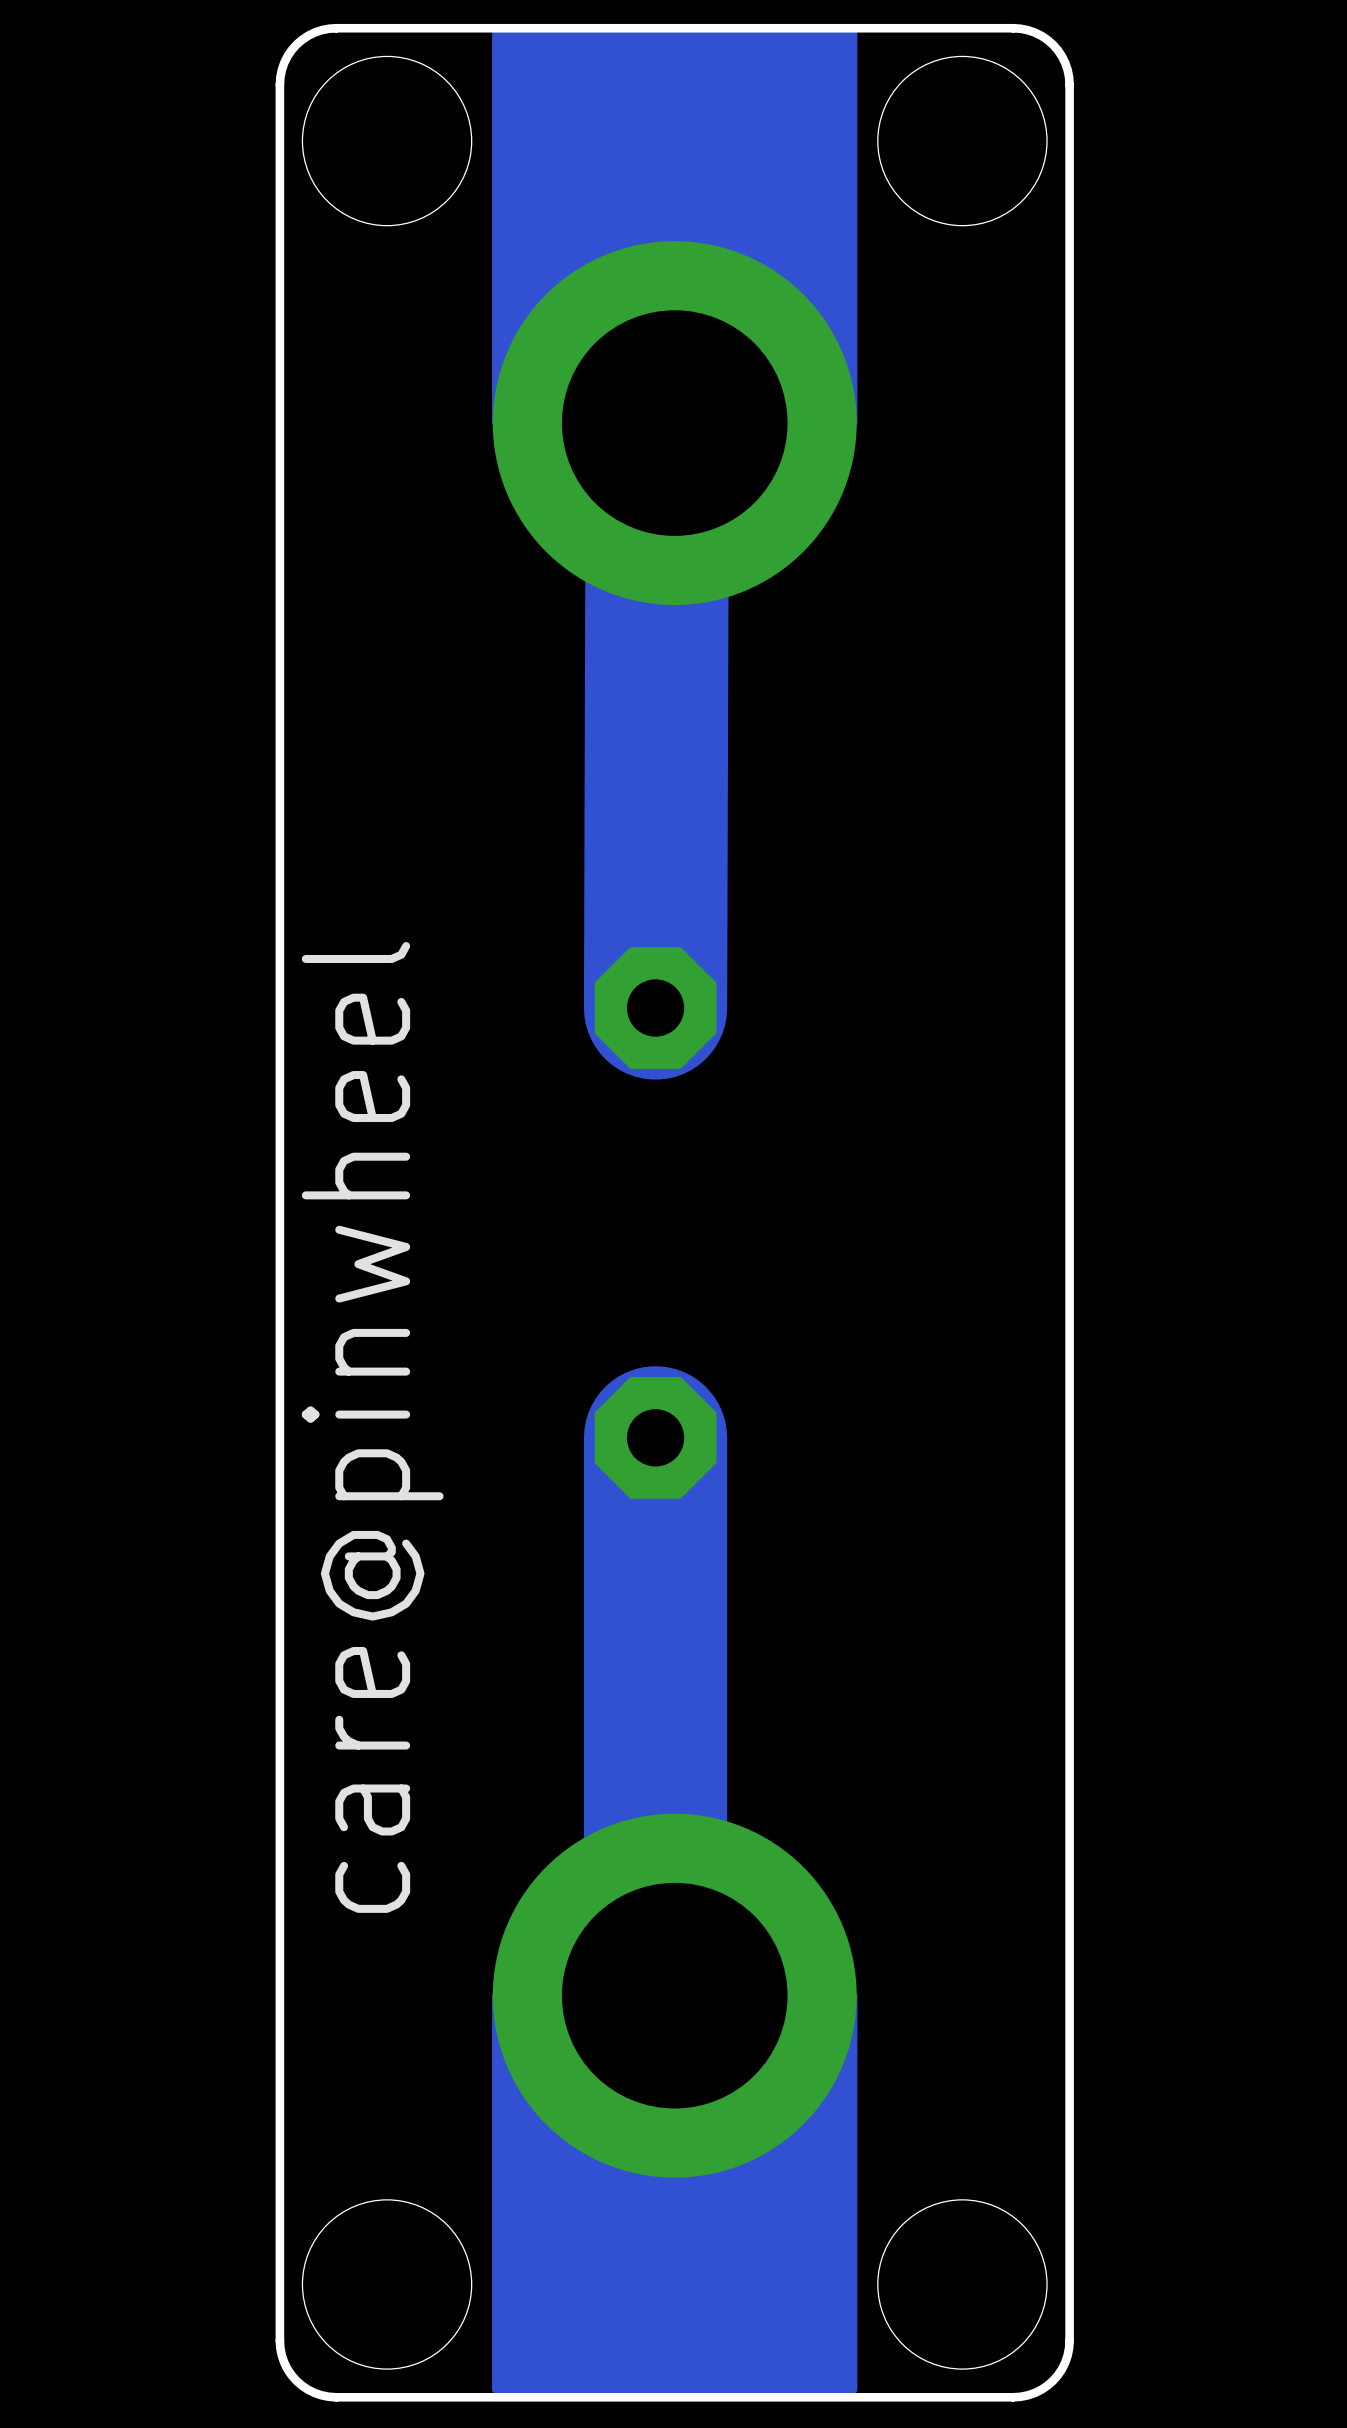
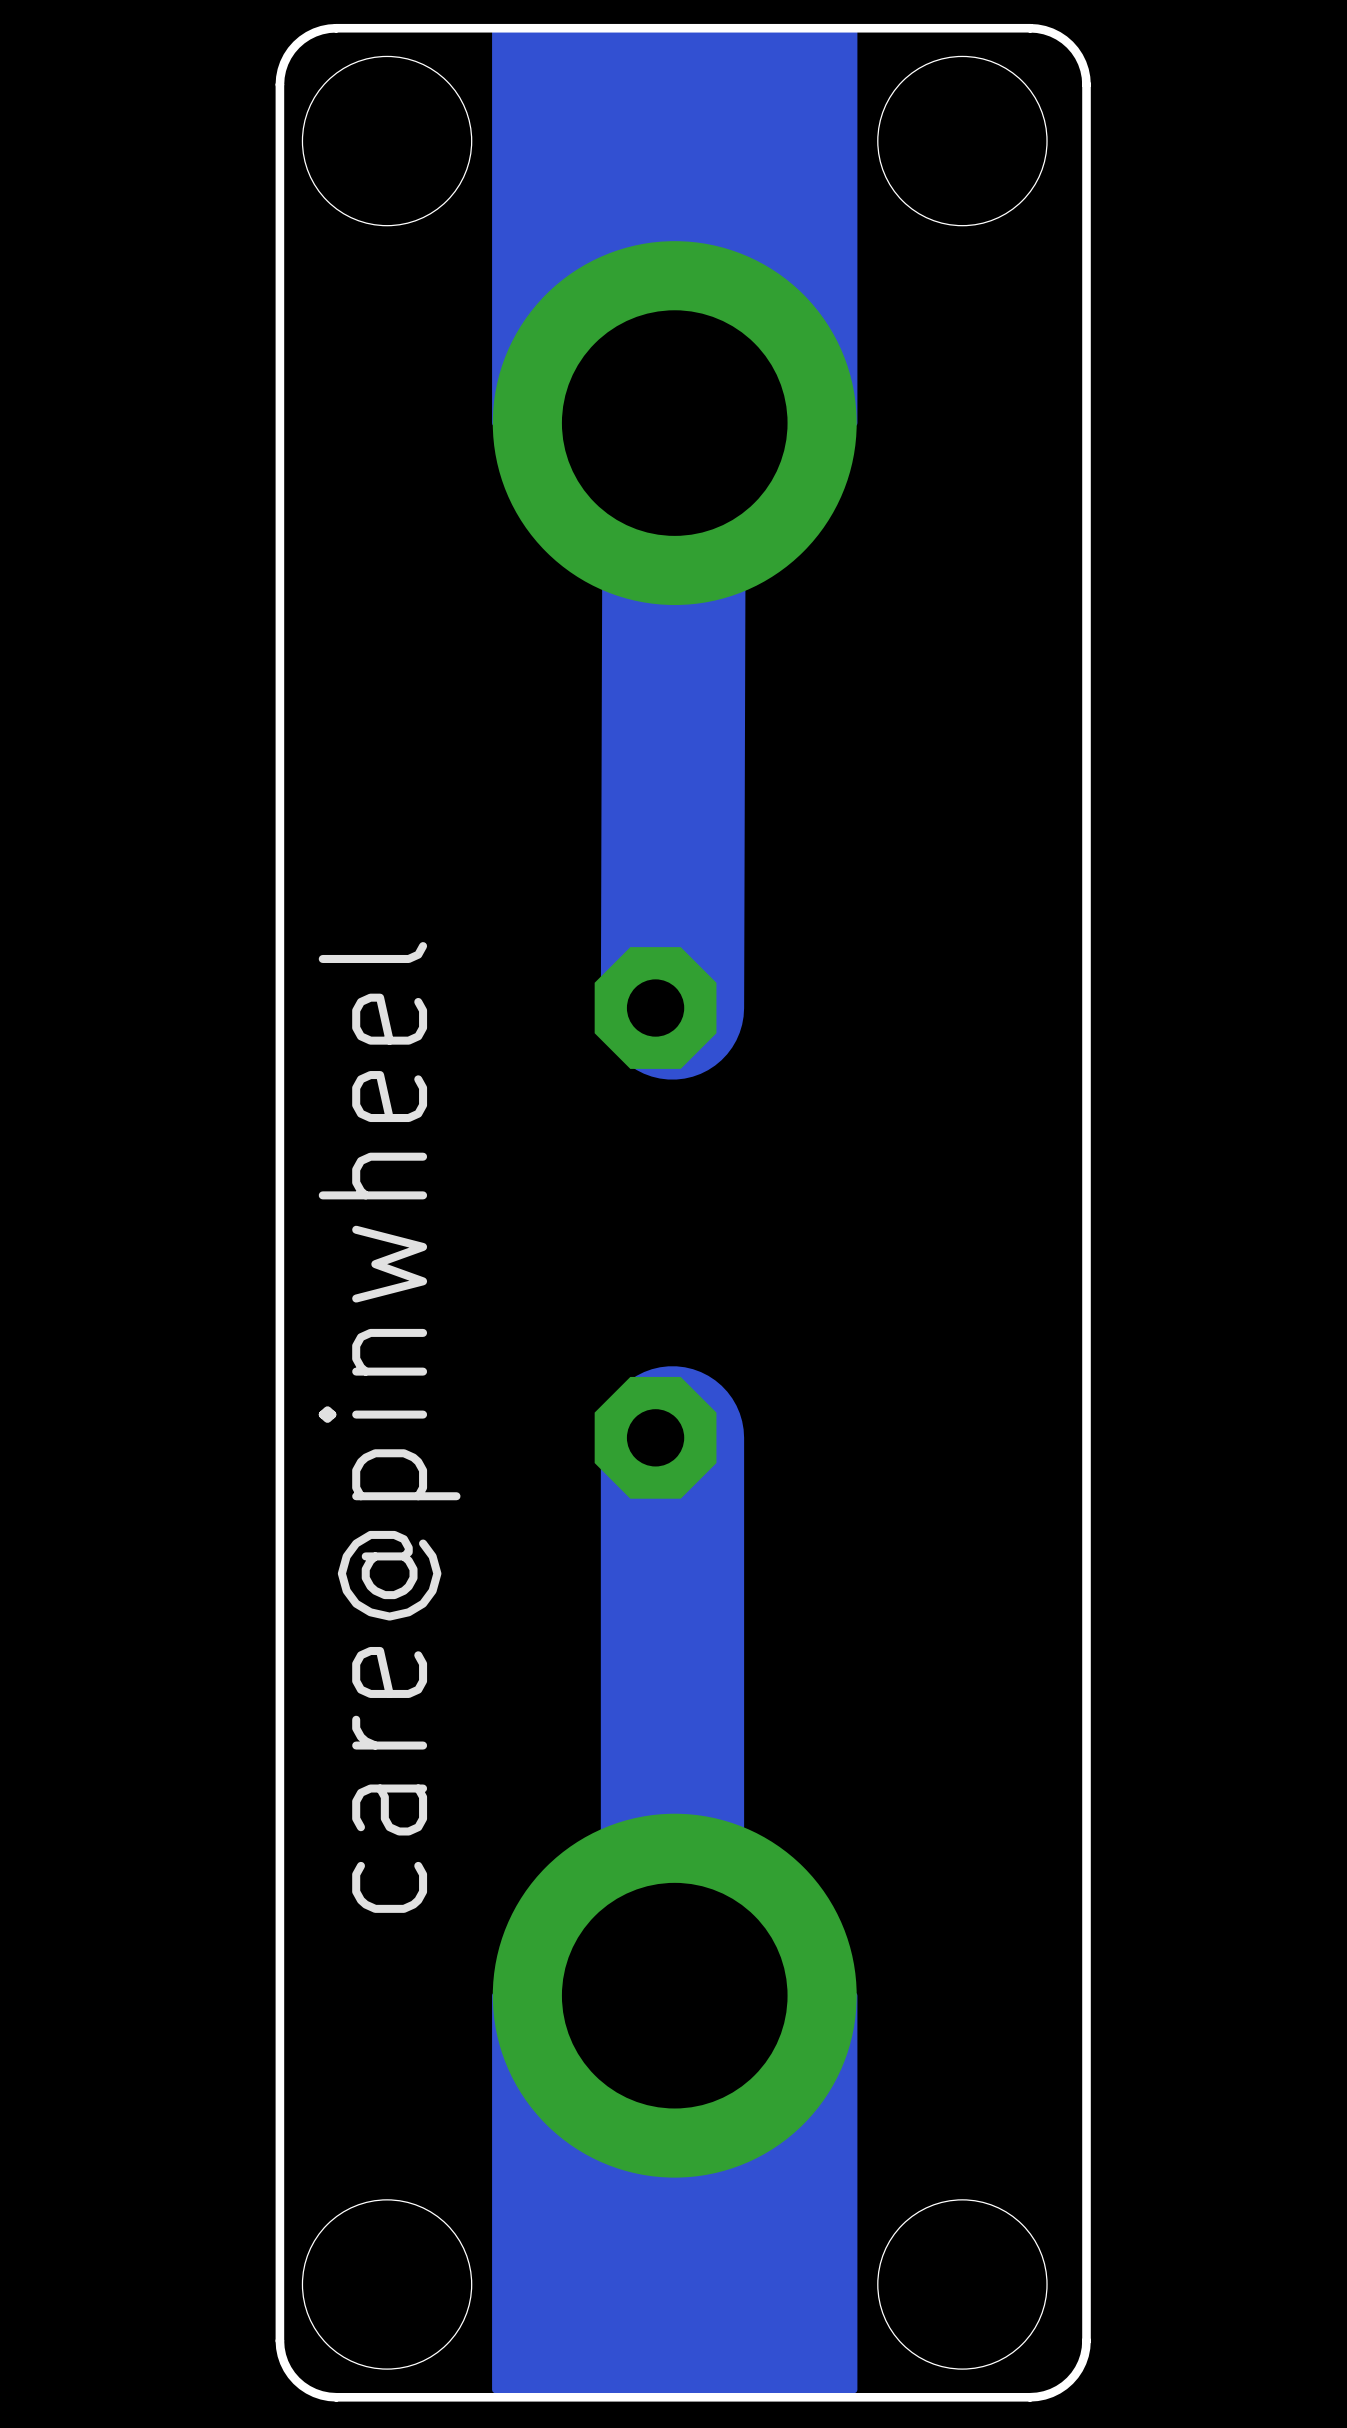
board edge: (1013, 28) (1034, 32) (1053, 44) (1065, 63) (1069, 84) (1069, 2340) (1065, 2362) (1053, 2380) (1034, 2392) (1013, 2397) -> (1013, 28) (1044, 30) (1064, 39) (1074, 50) (1082, 63) (1086, 84) (1086, 2340) (1082, 2362) (1074, 2375) (1064, 2385) (1044, 2395) (1013, 2397)
track: (674, 423) (657, 423) (655, 1008) -> (674, 423) (672, 1008)
text position: care@pinwheel (372, 1427) -> care@pinwheel (389, 1427)
track: (655, 1437) (655, 1982) (629, 2008) -> (672, 1437) (672, 1982) (646, 2008)

